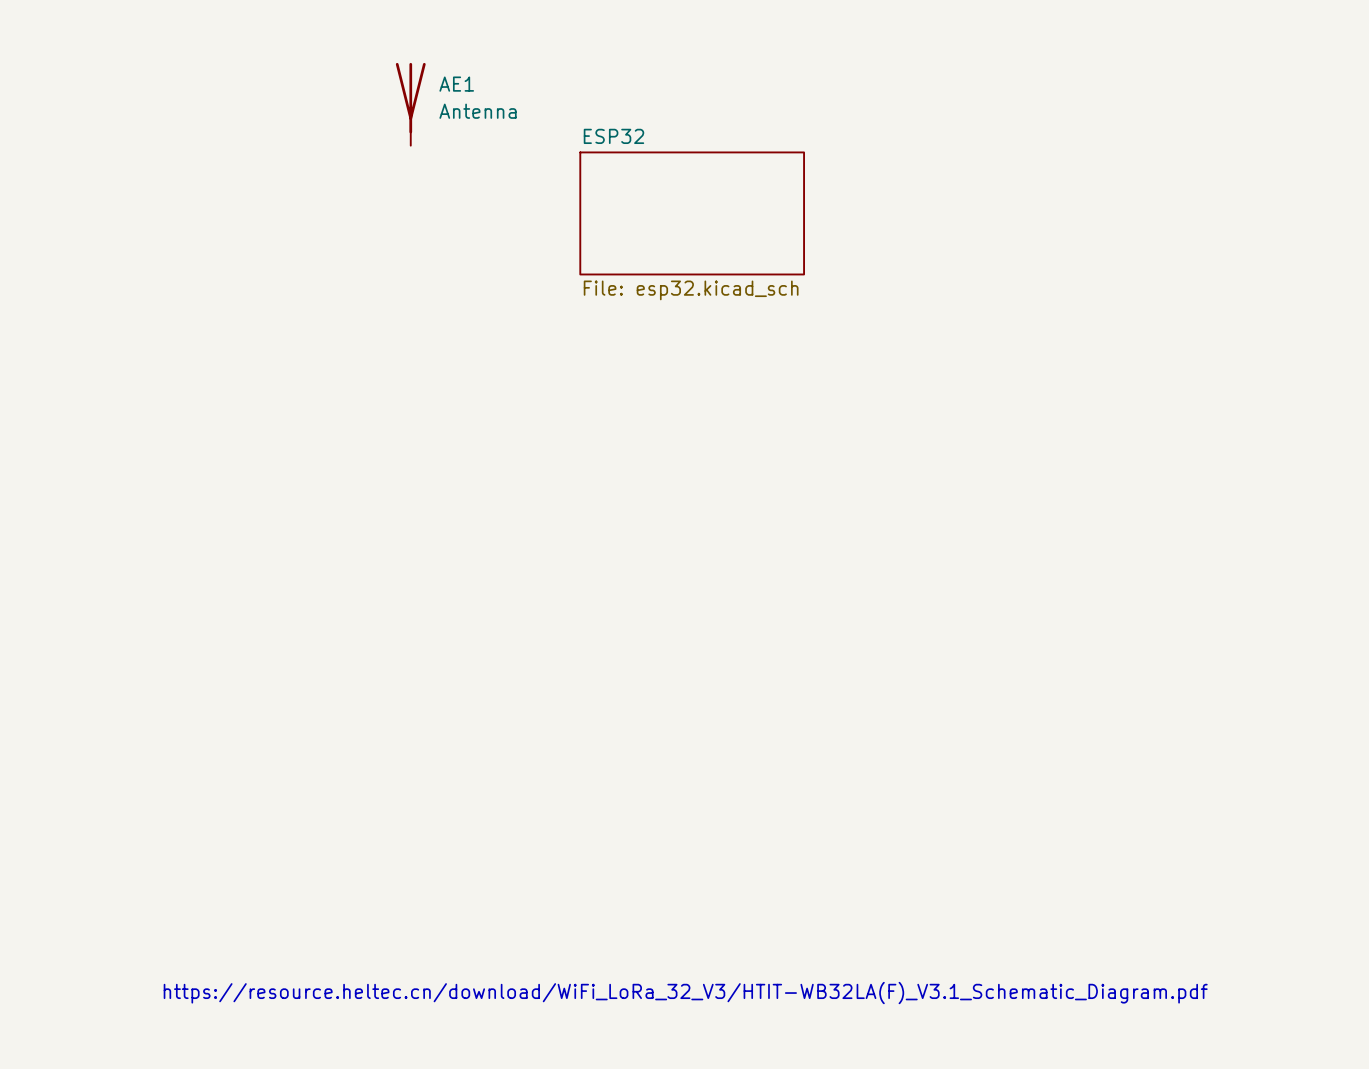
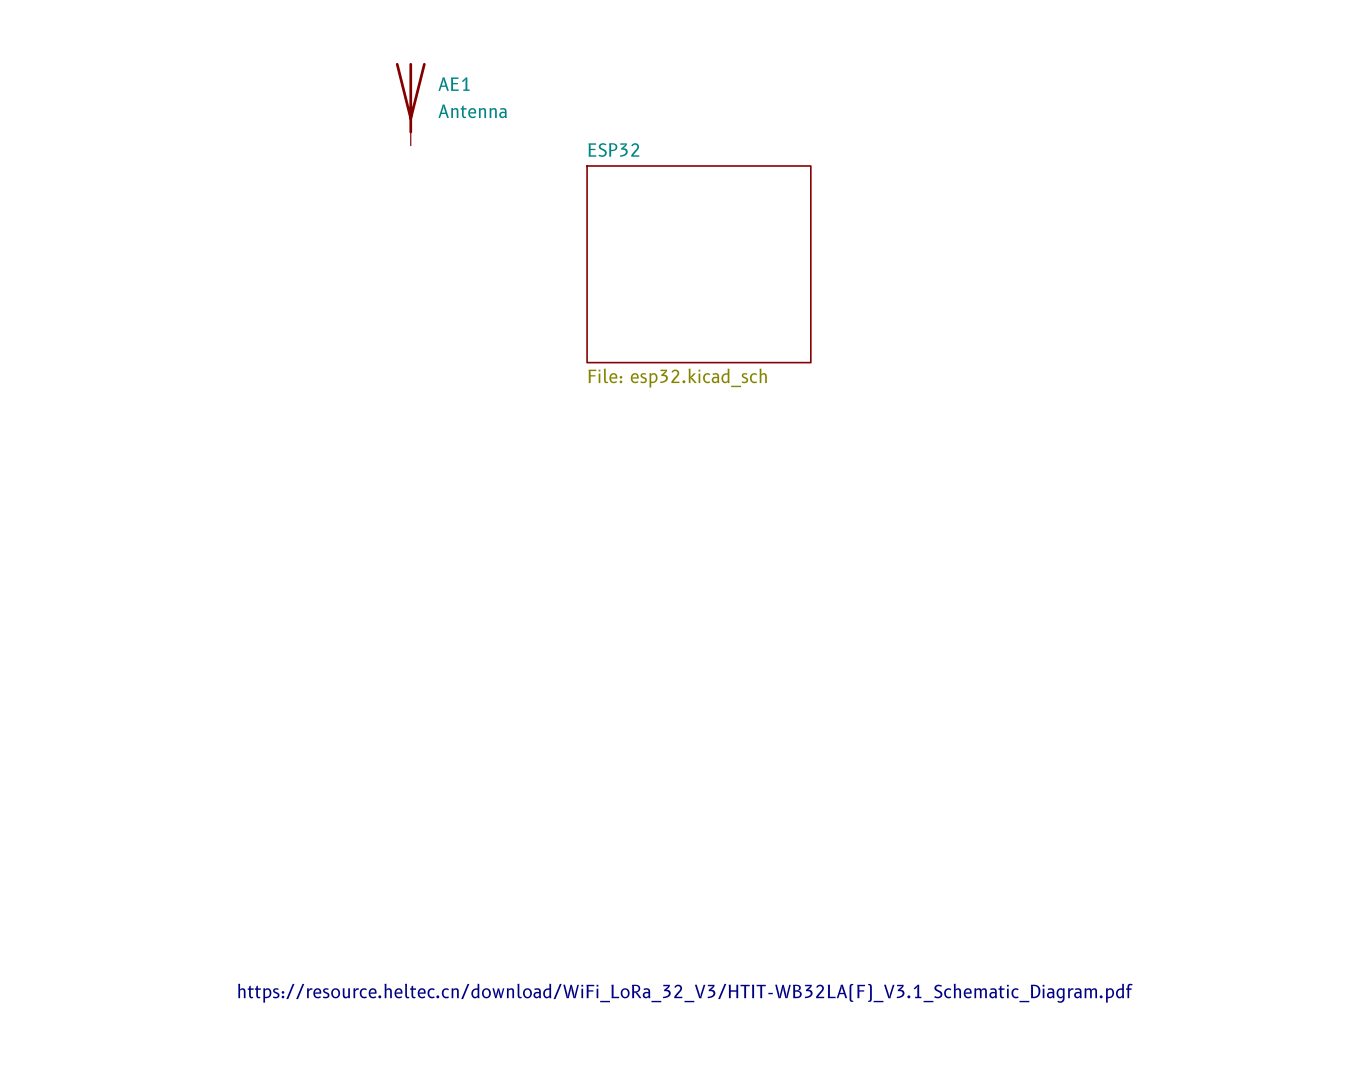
sheet ESP32 name position: ESP32 (613, 136) -> ESP32 (613, 150)
sheet ESP32 shape: [579, 151, 805, 276] -> [586, 165, 812, 364]
sheet ESP32 value position: File: esp32.kicad_sch (691, 290) -> File: esp32.kicad_sch (677, 378)

